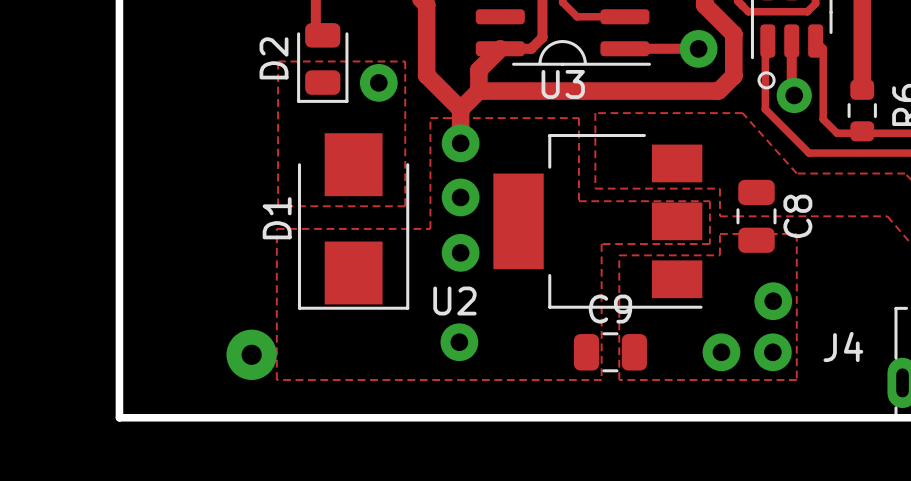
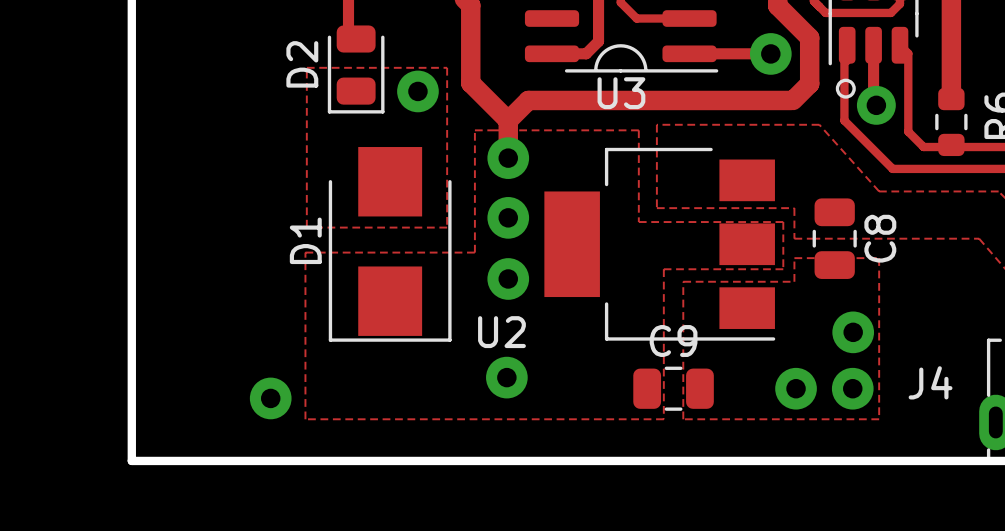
track: (500, 48) (478, 70) (478, 91) -> none
via size: [226, 329, 277, 380] -> [249, 377, 292, 420]

